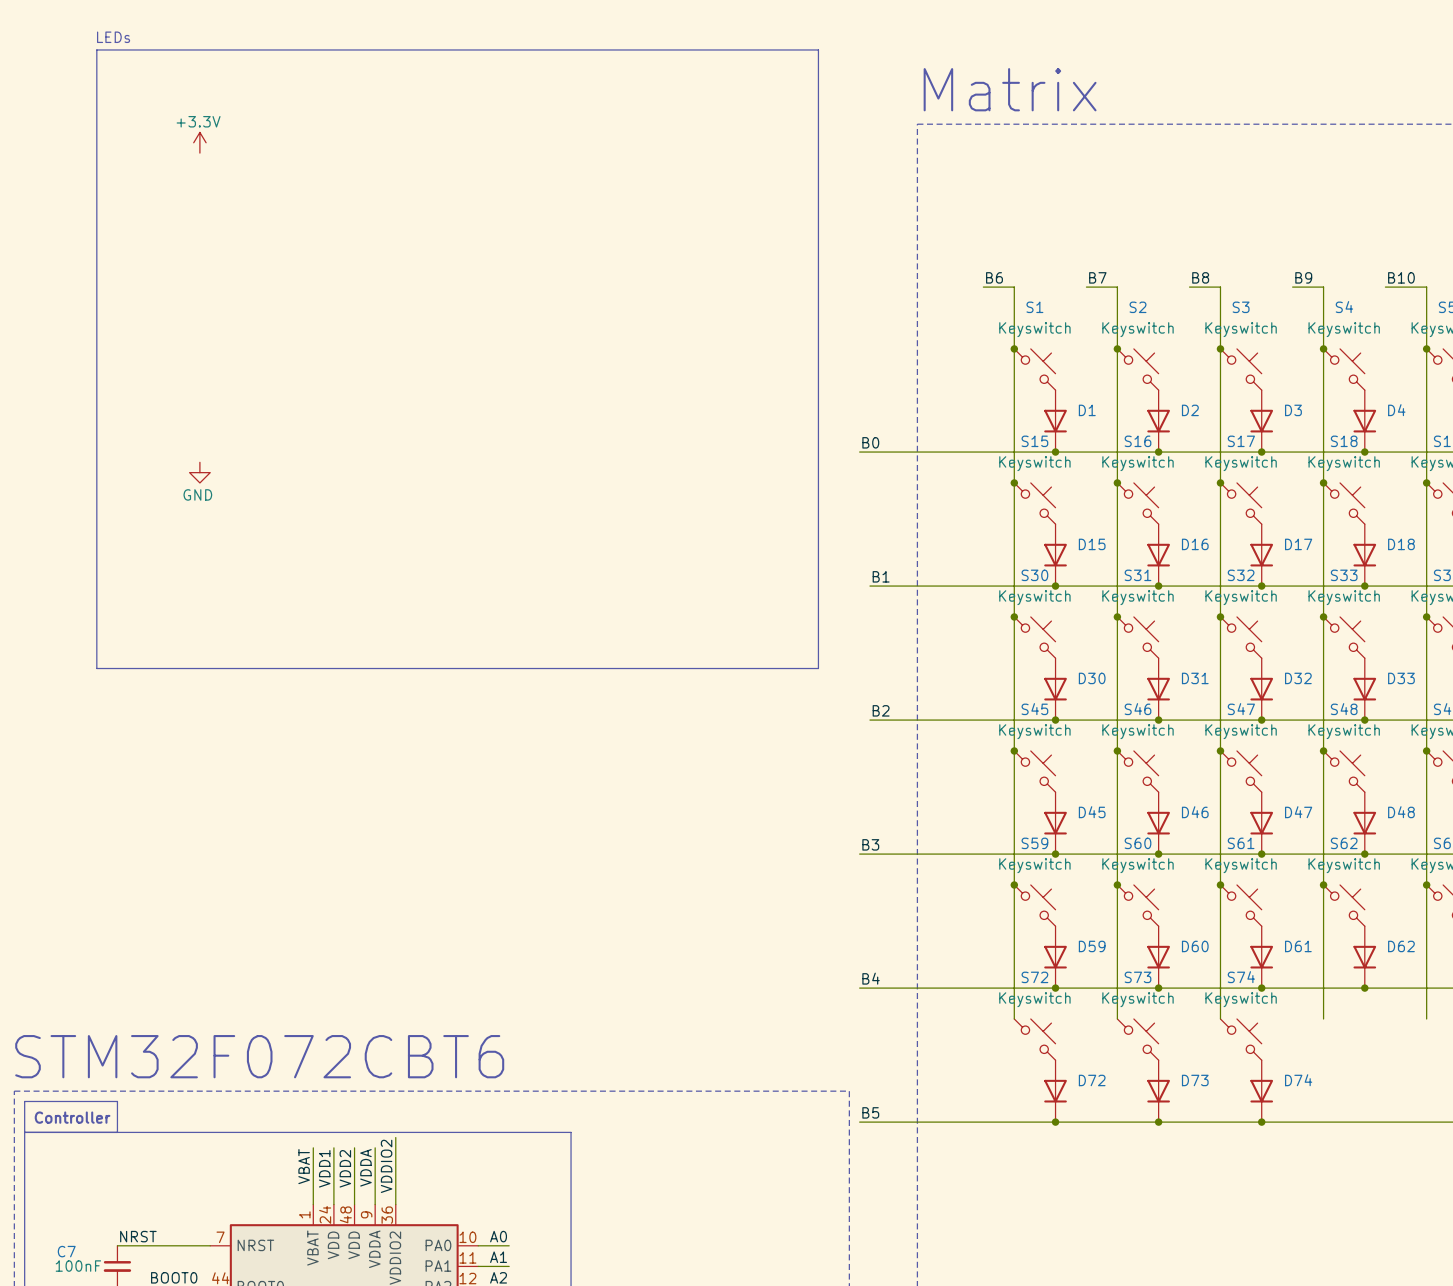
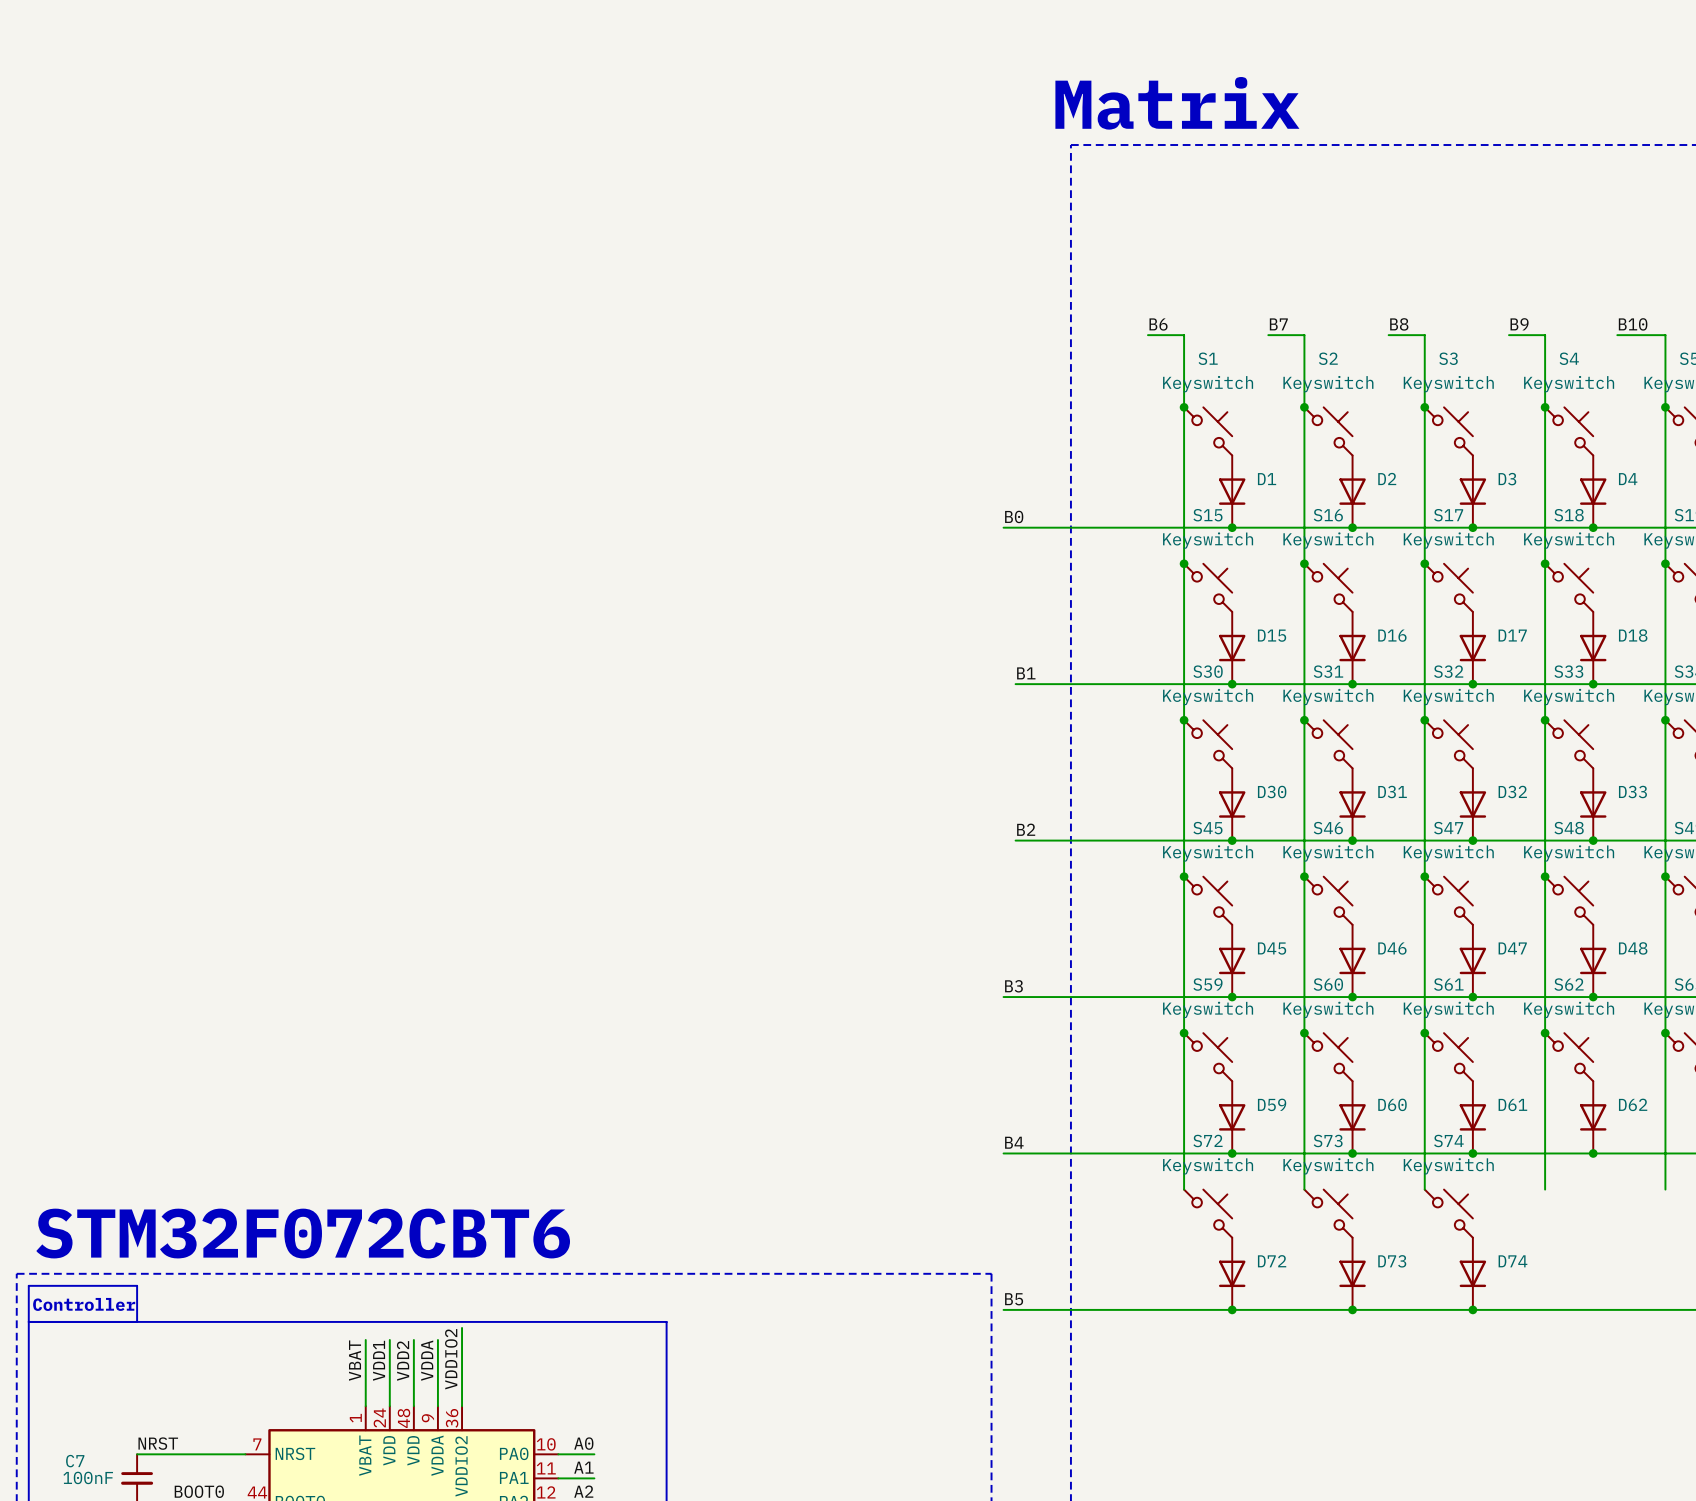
text: LEDs (113, 37) -> none
line: (96, 49) (818, 49) (818, 668) (96, 668) (96, 49) -> none
power symbol: +3.3V (199, 142) -> none
power symbol: GND (199, 472) -> none

